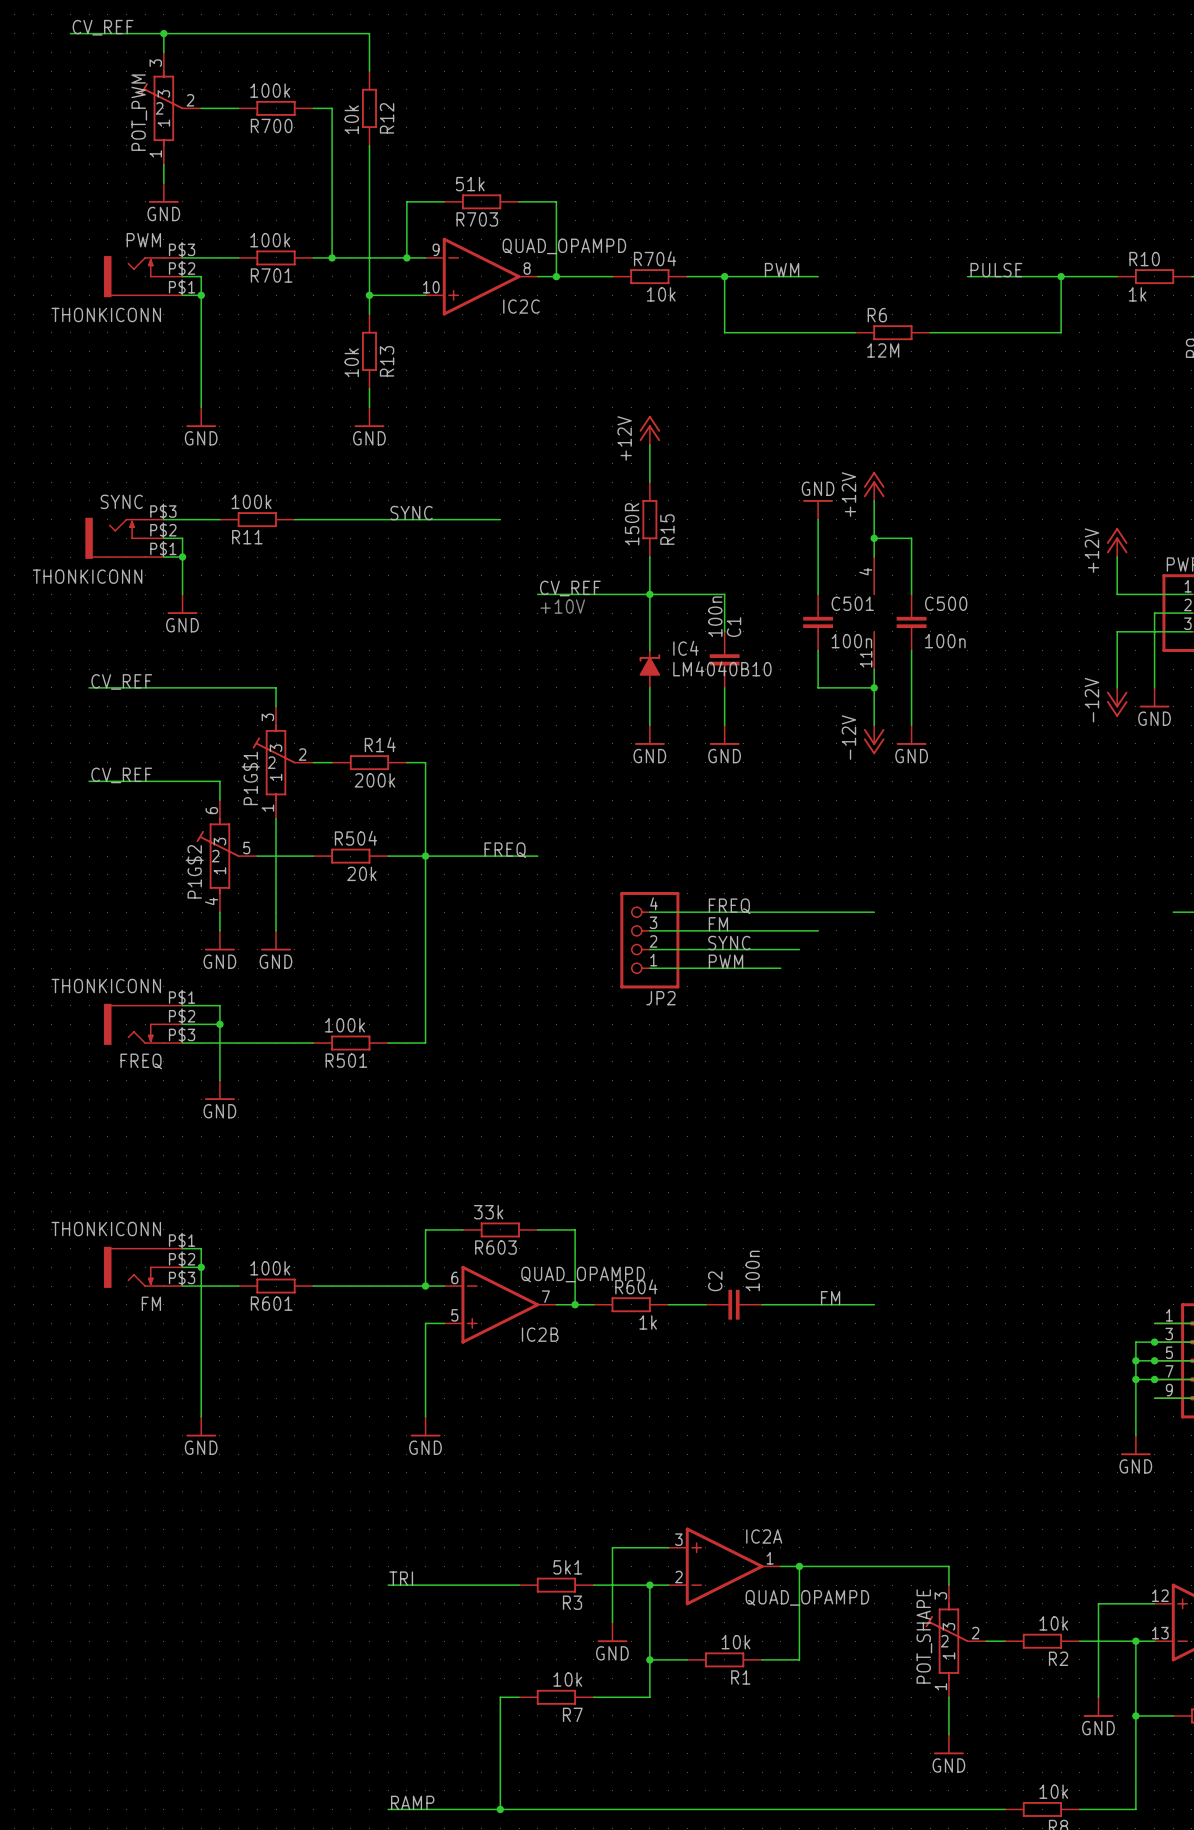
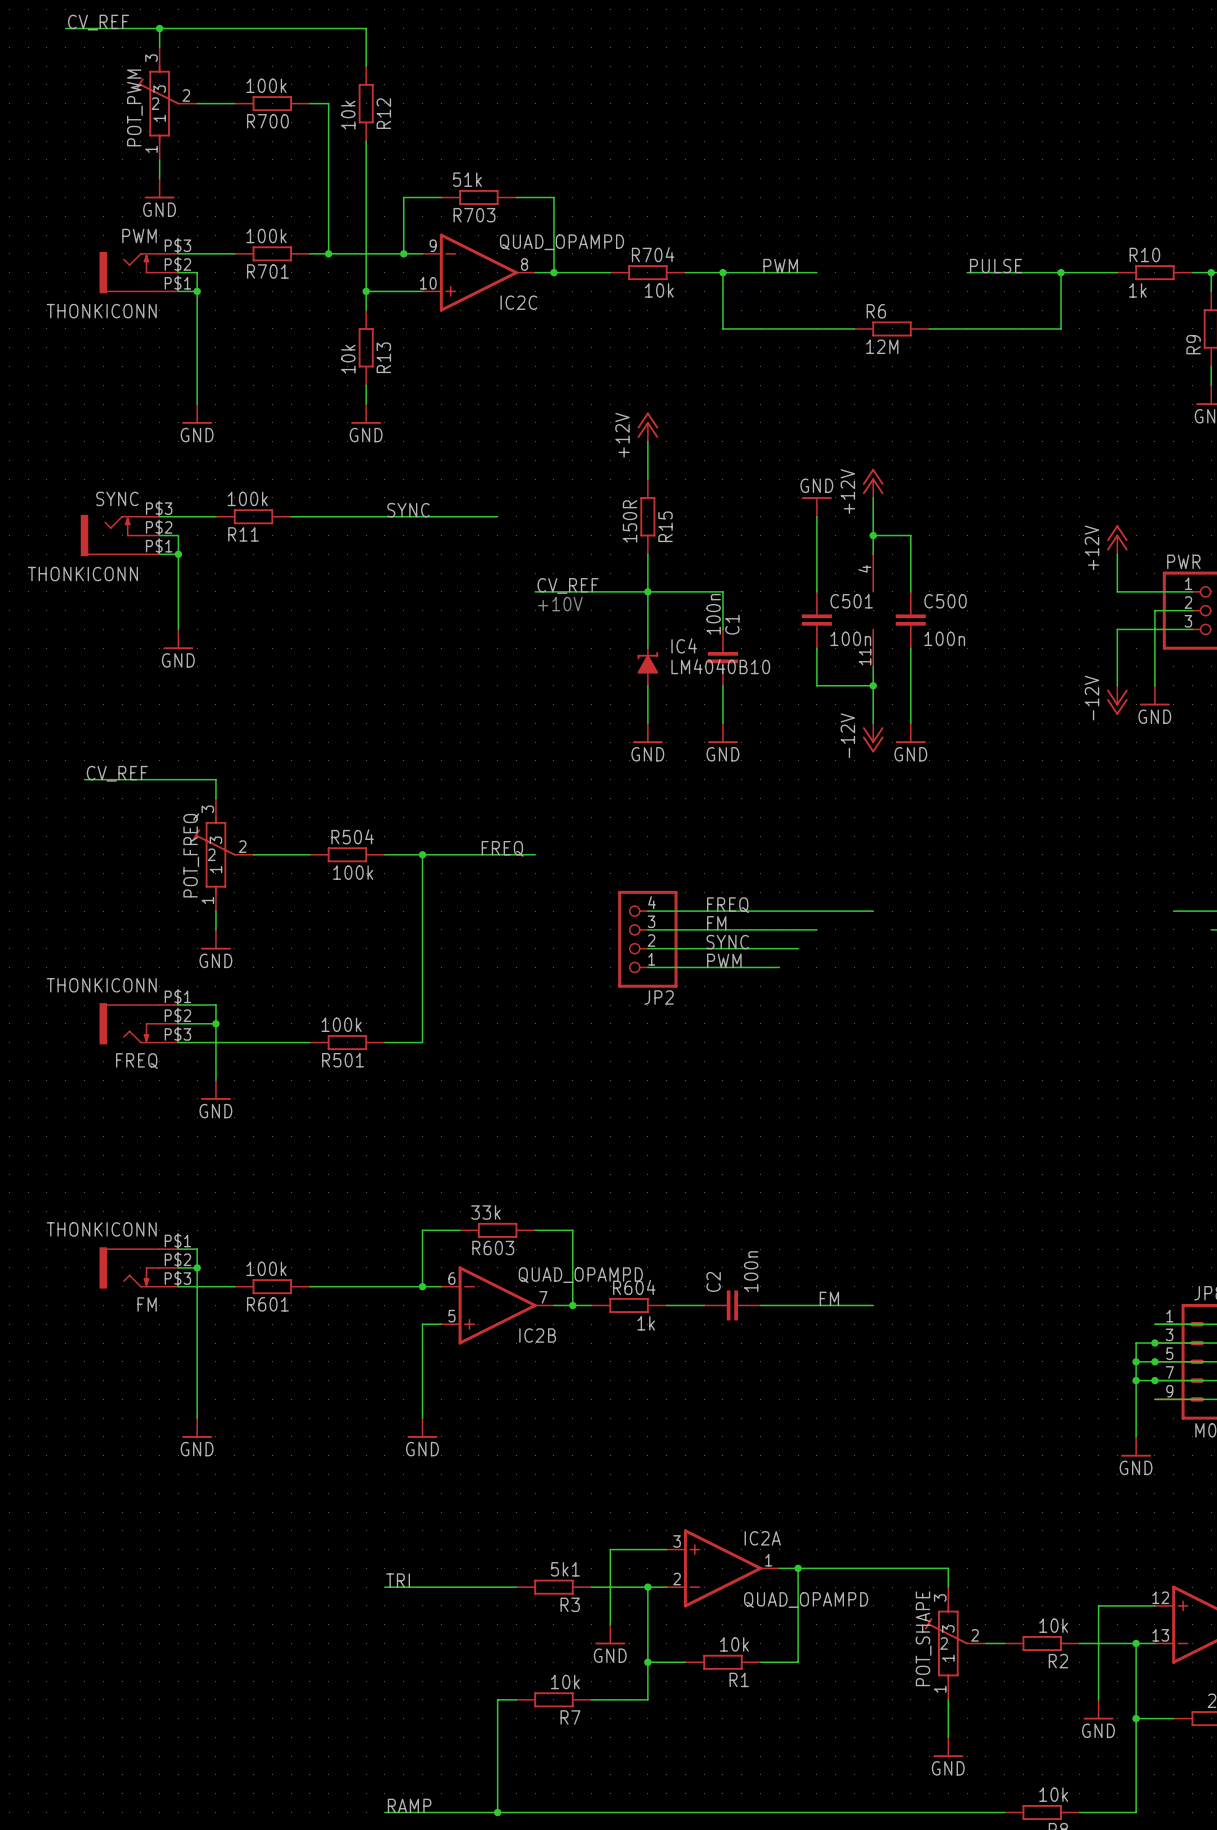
power symbol position: GND (182, 604) -> GND (178, 639)
label: CV_REF (121, 681) -> none
wire: (89, 687) (276, 687) (276, 706) -> none
P1G$1: (283, 762) -> none
wire: (313, 762) (332, 762) -> none
R14: 200k (369, 762) -> none
wire: (406, 762) (425, 762) (425, 856) -> none
P1G$2 pin number: 6 (211, 810) -> 3 (207, 809)
wire: (276, 818) (276, 930) -> none
P1G$2 pin number: 5 (246, 848) -> 2 (242, 846)
P1G$2 name: P1G$2 (194, 871) -> POT_FREQ (191, 855)
R504 value: 20k (361, 873) -> 100k (353, 872)
P1G$2 pin number: 4 (211, 901) -> 1 (207, 900)
power symbol: GND (276, 940) -> none

